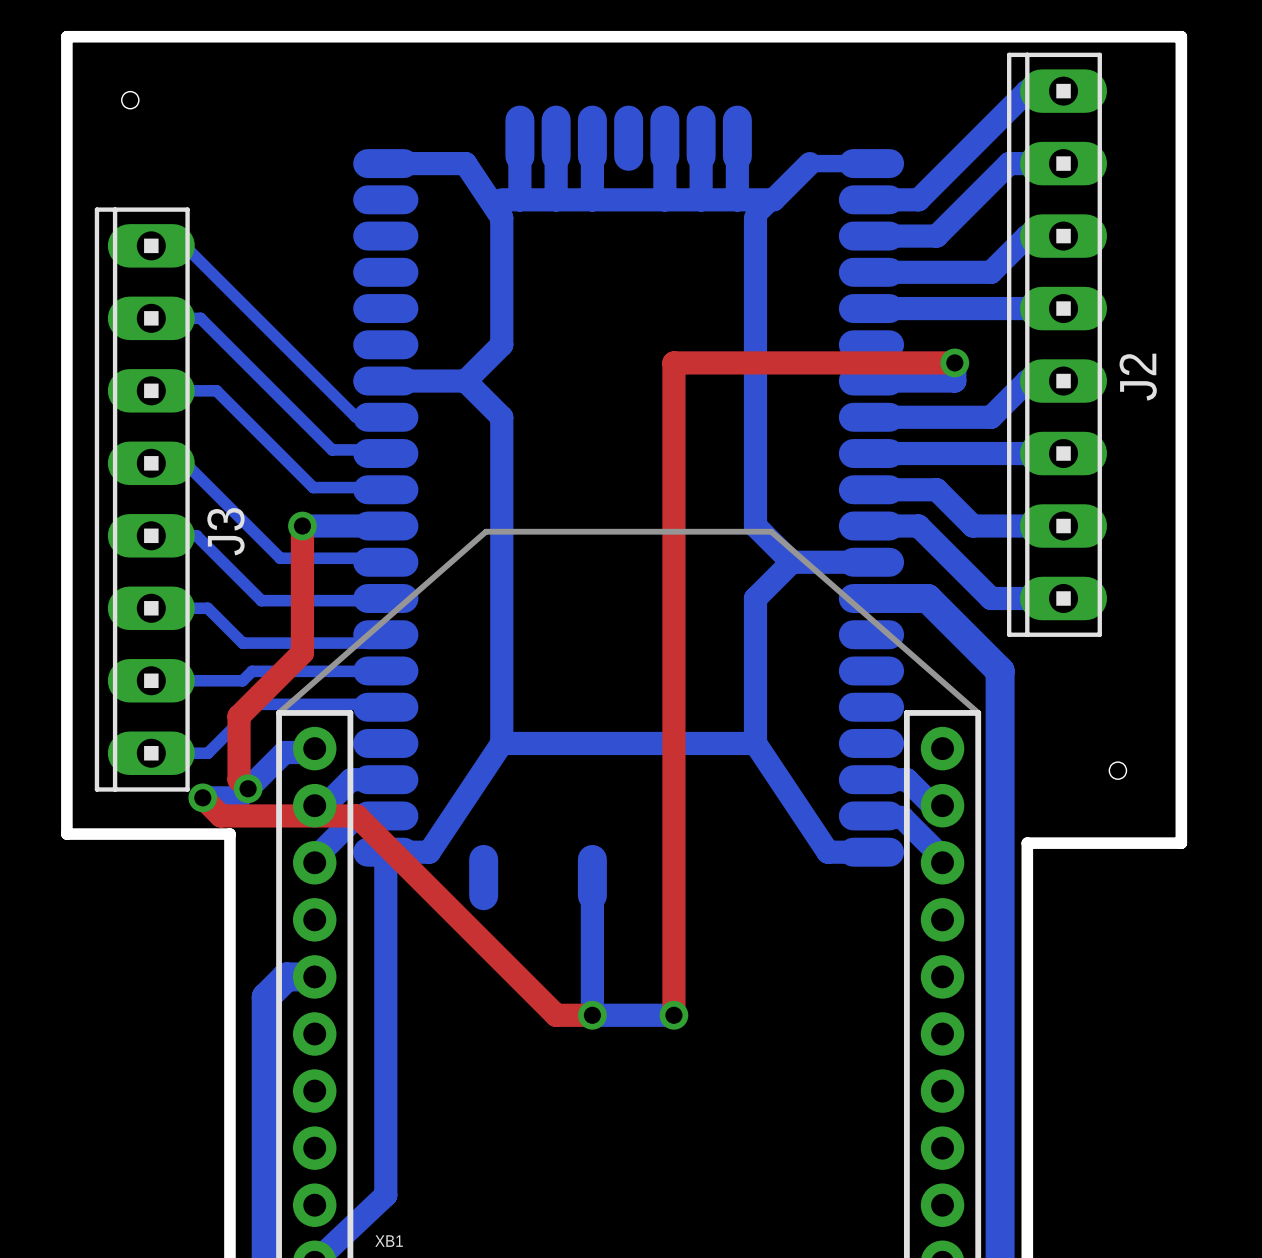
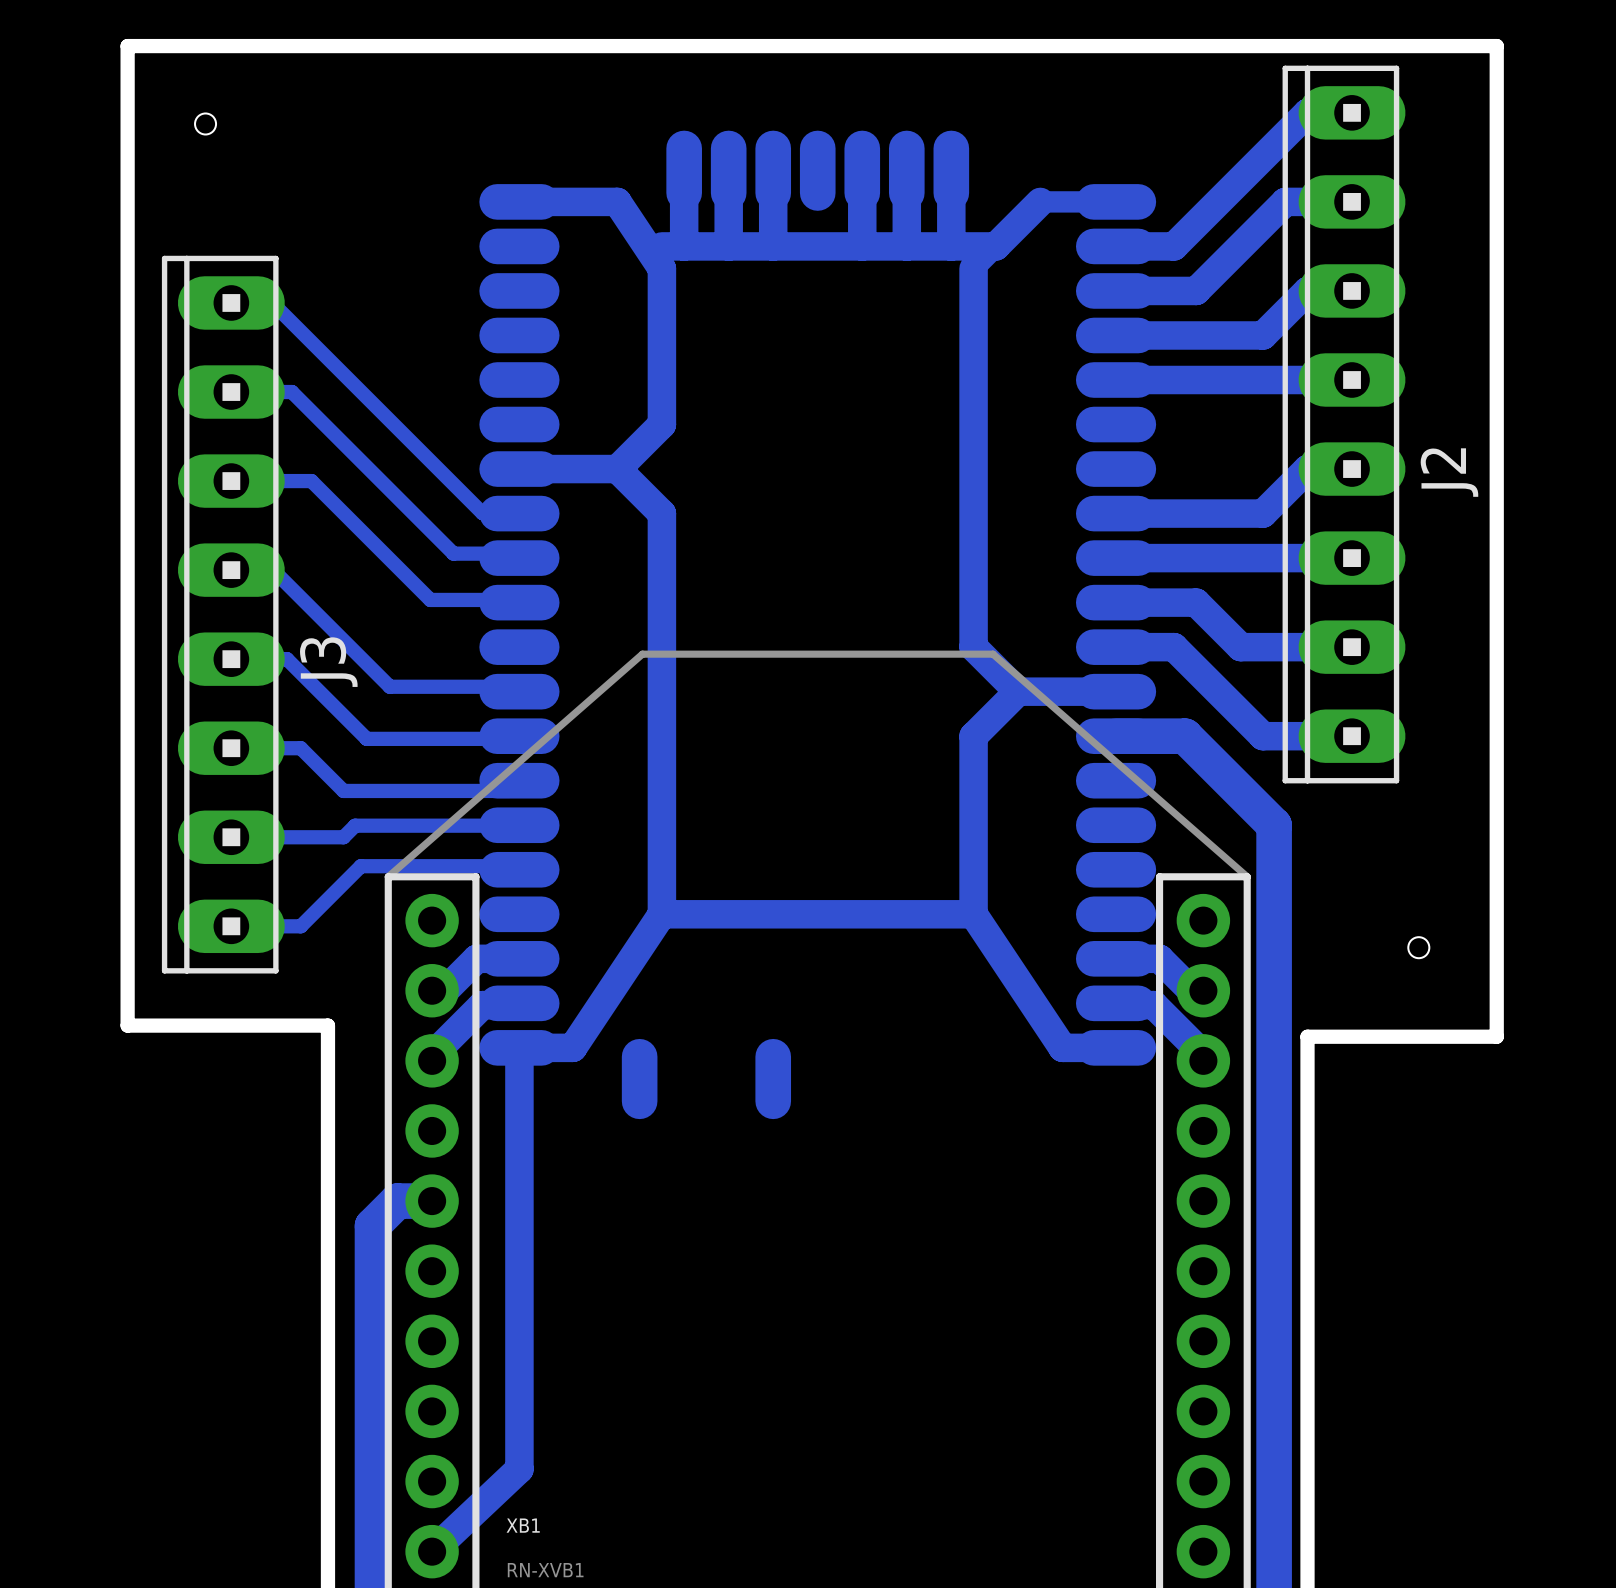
bottom track: (954, 362) (954, 381) (871, 381) -> none
top track: (954, 362) (673, 362) (673, 1015) -> none
via: (954, 362) -> none
bottom track: (302, 526) (385, 526) -> none
top track: (302, 526) (302, 652) (239, 716) (239, 779) (248, 788) -> none
via: (302, 526) -> none
bottom track: (314, 748) (310, 752) (284, 752) (239, 797) (202, 797) -> none
via: (248, 788) -> none
top track: (202, 797) (220, 815) (356, 815) (556, 1015) (592, 1015) -> none
via: (202, 797) -> none
bottom track: (592, 877) (592, 1015) (673, 1015) -> none
via: (592, 1015) -> none
via: (673, 1015) -> none

